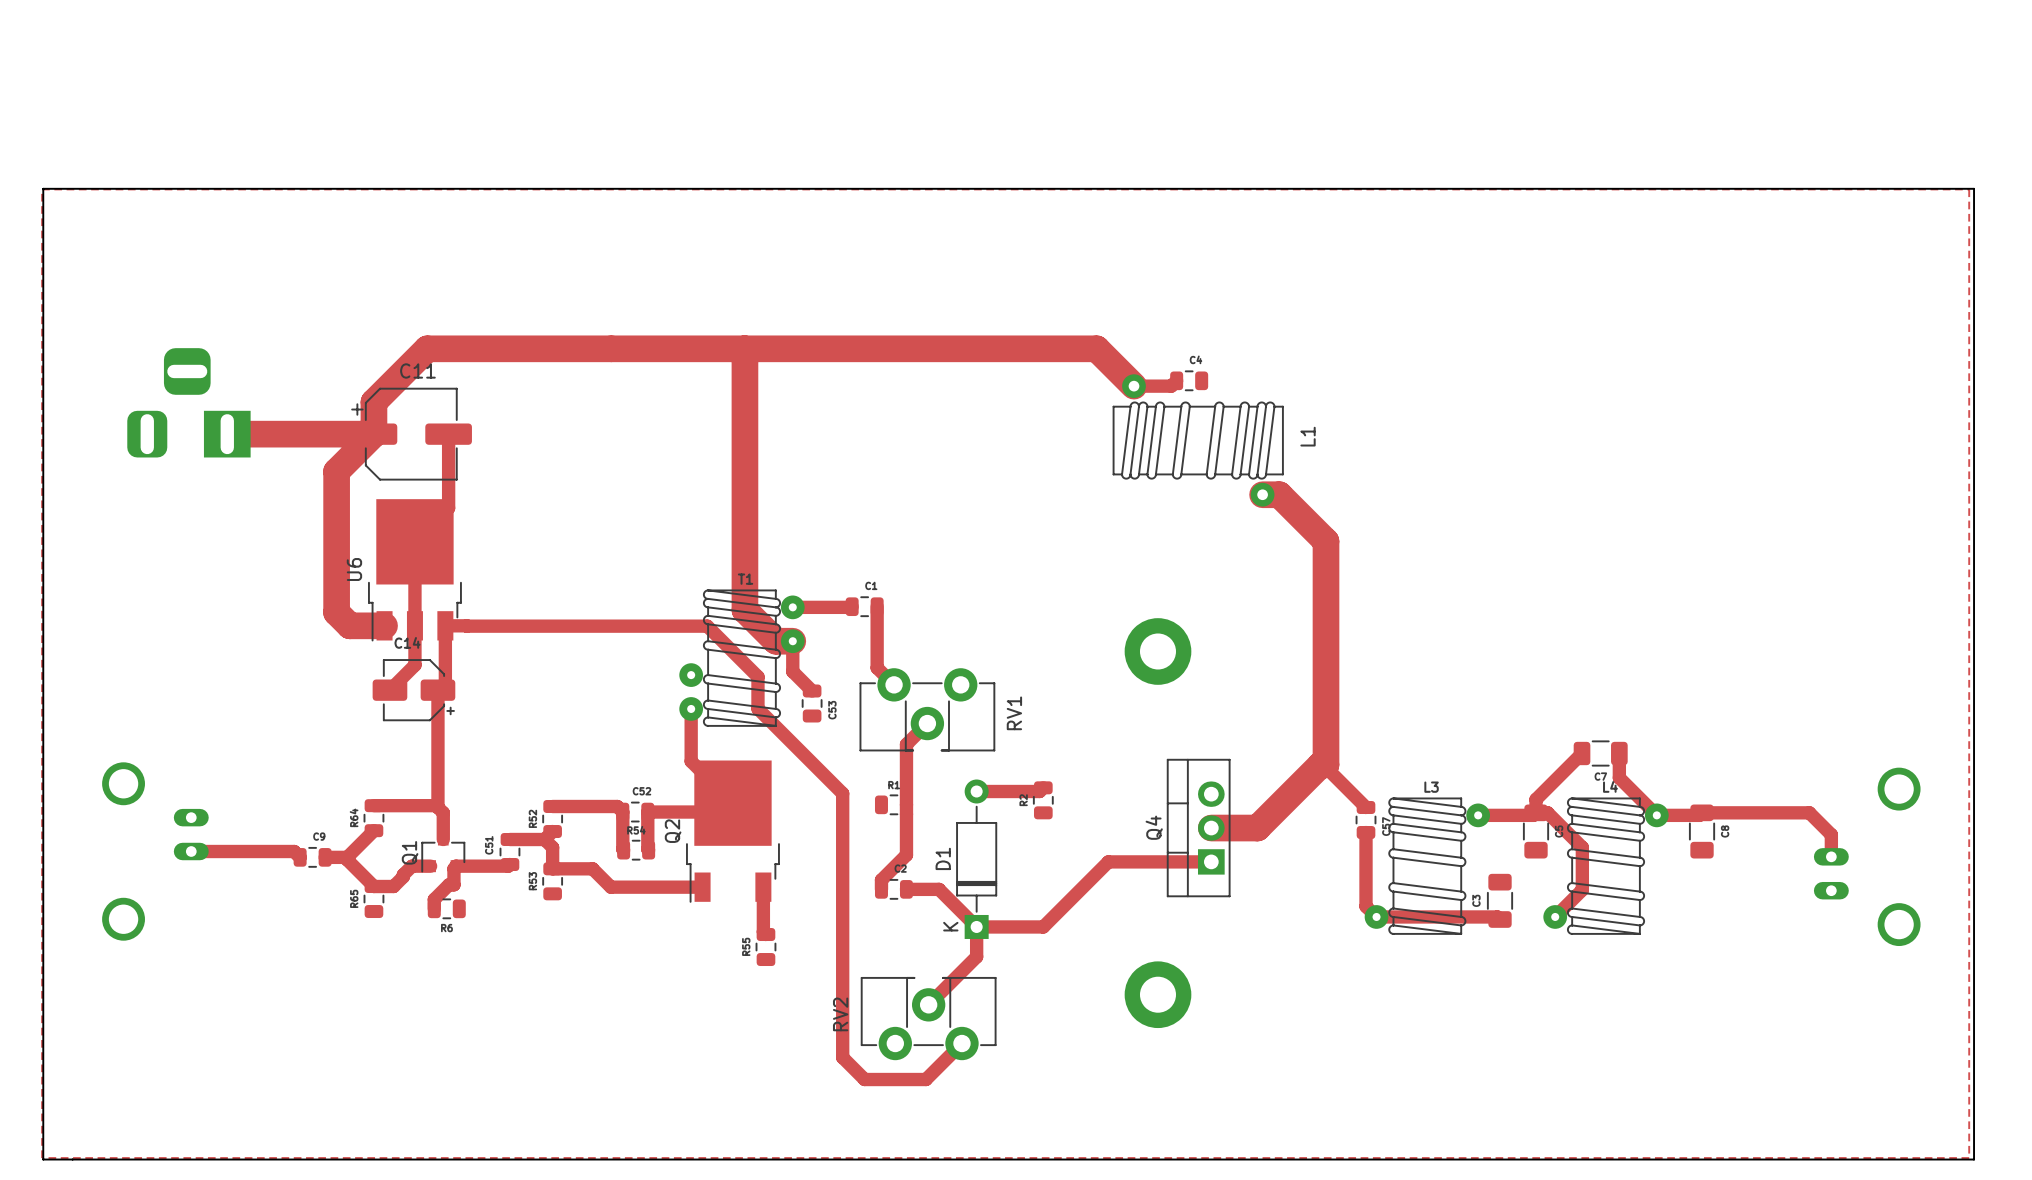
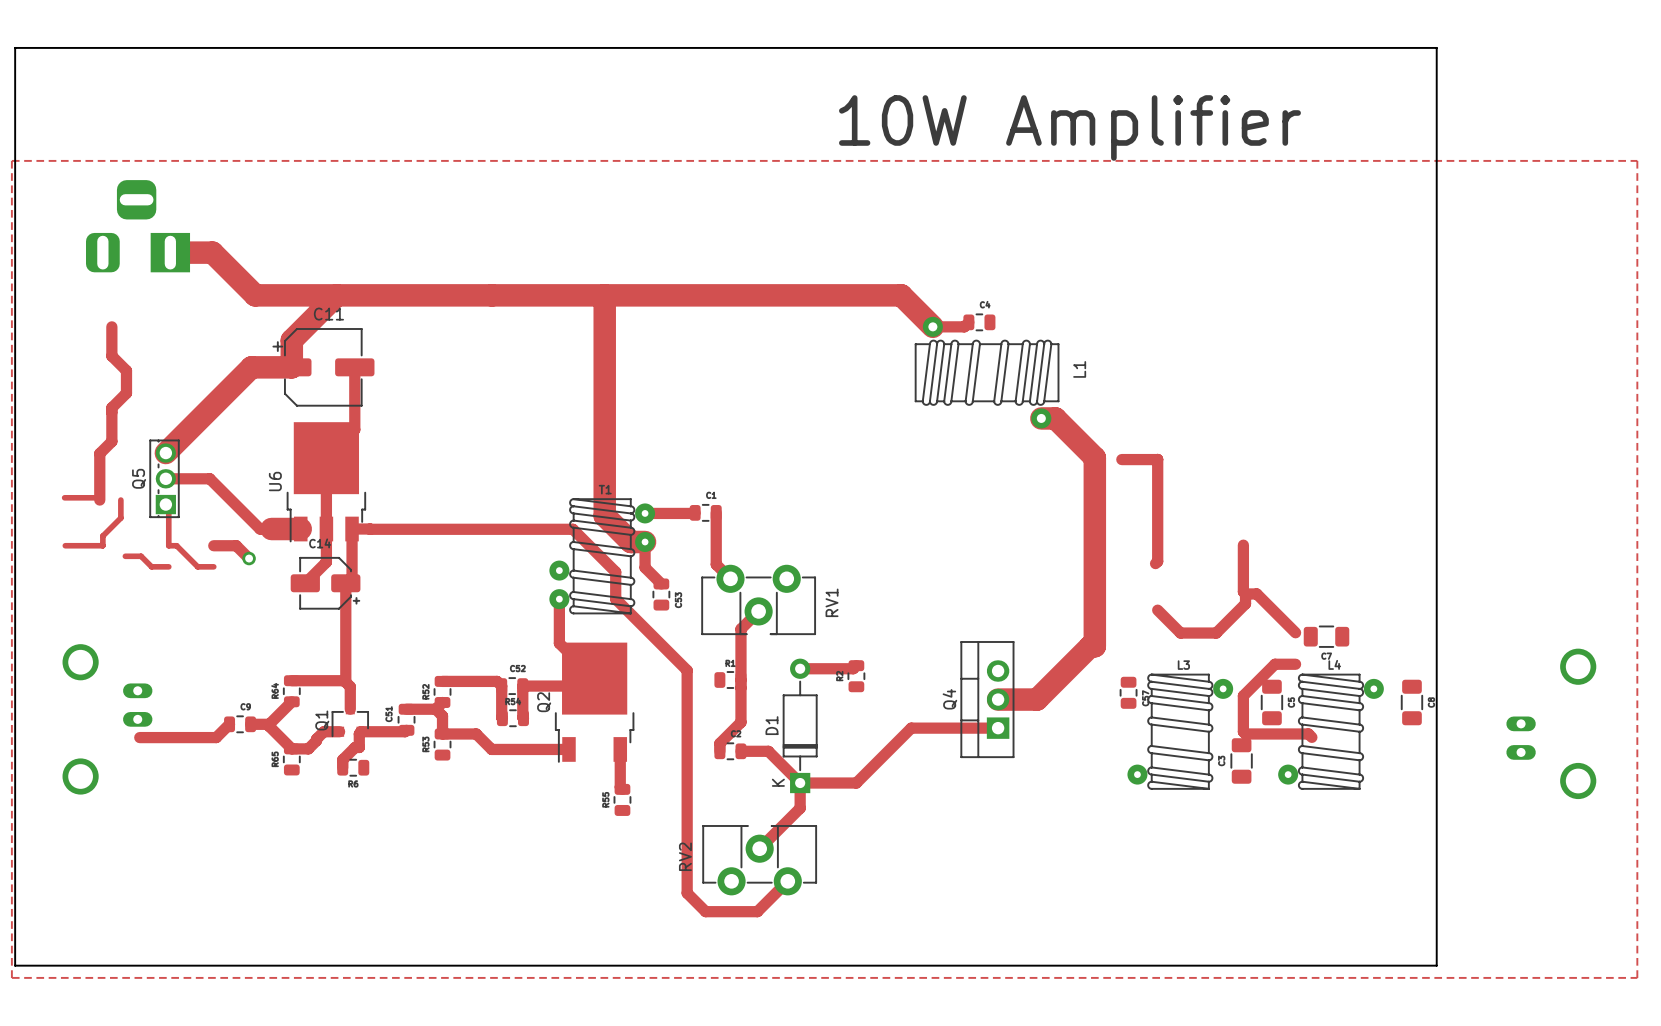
text: none -> 10W Amplifier (1069, 127)
board edge: (43, 188) (43, 1159) (1974, 1159) (1974, 188) (43, 188) -> (15, 47) (15, 965) (1436, 965) (1436, 47) (15, 47)
track: none -> (170, 252) (212, 252) (255, 295) (336, 295)
track: none -> (111, 326) (111, 356) (126, 370) (126, 393) (111, 407) (111, 441) (99, 453) (99, 500) (97, 497) (64, 497)
part position: (188, 402) -> (138, 226)
track: (227, 434) (326, 434) -> (168, 450) (165, 453) (251, 367)
track: (373, 434) (336, 471) (336, 612) (349, 625) -> (165, 478) (209, 478) (260, 529) (271, 529)
track: none -> (1121, 459) (1157, 459)
track: none -> (1157, 459) (1157, 561) (1155, 563)
Q5: none -> (164, 478)
track: none -> (120, 500) (120, 518) (102, 536) (102, 545)
track: none -> (165, 504) (168, 507) (168, 545) (176, 545) (197, 566) (213, 566)
track: none -> (1243, 545) (1243, 591) (1245, 593)
track: none -> (65, 545) (102, 545)
track: none -> (213, 545) (236, 545) (249, 558)
part: (1157, 651) -> none
track: none -> (125, 556) (141, 556) (151, 566) (168, 566)
via: none -> (249, 558)
track: none -> (1245, 593) (1256, 593) (1295, 632)
track: none -> (1245, 593) (1245, 603) (1216, 633) (1180, 633) (1157, 610)
track: (1582, 753) (1536, 799) (1536, 812) -> none
track: (1619, 753) (1619, 777) (1656, 815) (1699, 815) (1702, 812) (1809, 812) (1831, 834) (1831, 856) -> none
track: (1326, 767) (1366, 807) -> none
track: none -> (1295, 664) (1274, 664) (1243, 695) (1243, 731) (1245, 733) (1308, 733) (1311, 737)
track: (1536, 812) (1533, 815) (1478, 815) -> none
track: (1536, 812) (1547, 812) (1582, 847) (1582, 889) (1555, 916) -> none
track: (1366, 832) (1366, 906) (1376, 916) (1497, 916) (1500, 919) -> none
track: (191, 851) (294, 851) (300, 857) -> (139, 737) (216, 737) (229, 724)
part: (1157, 994) -> none

